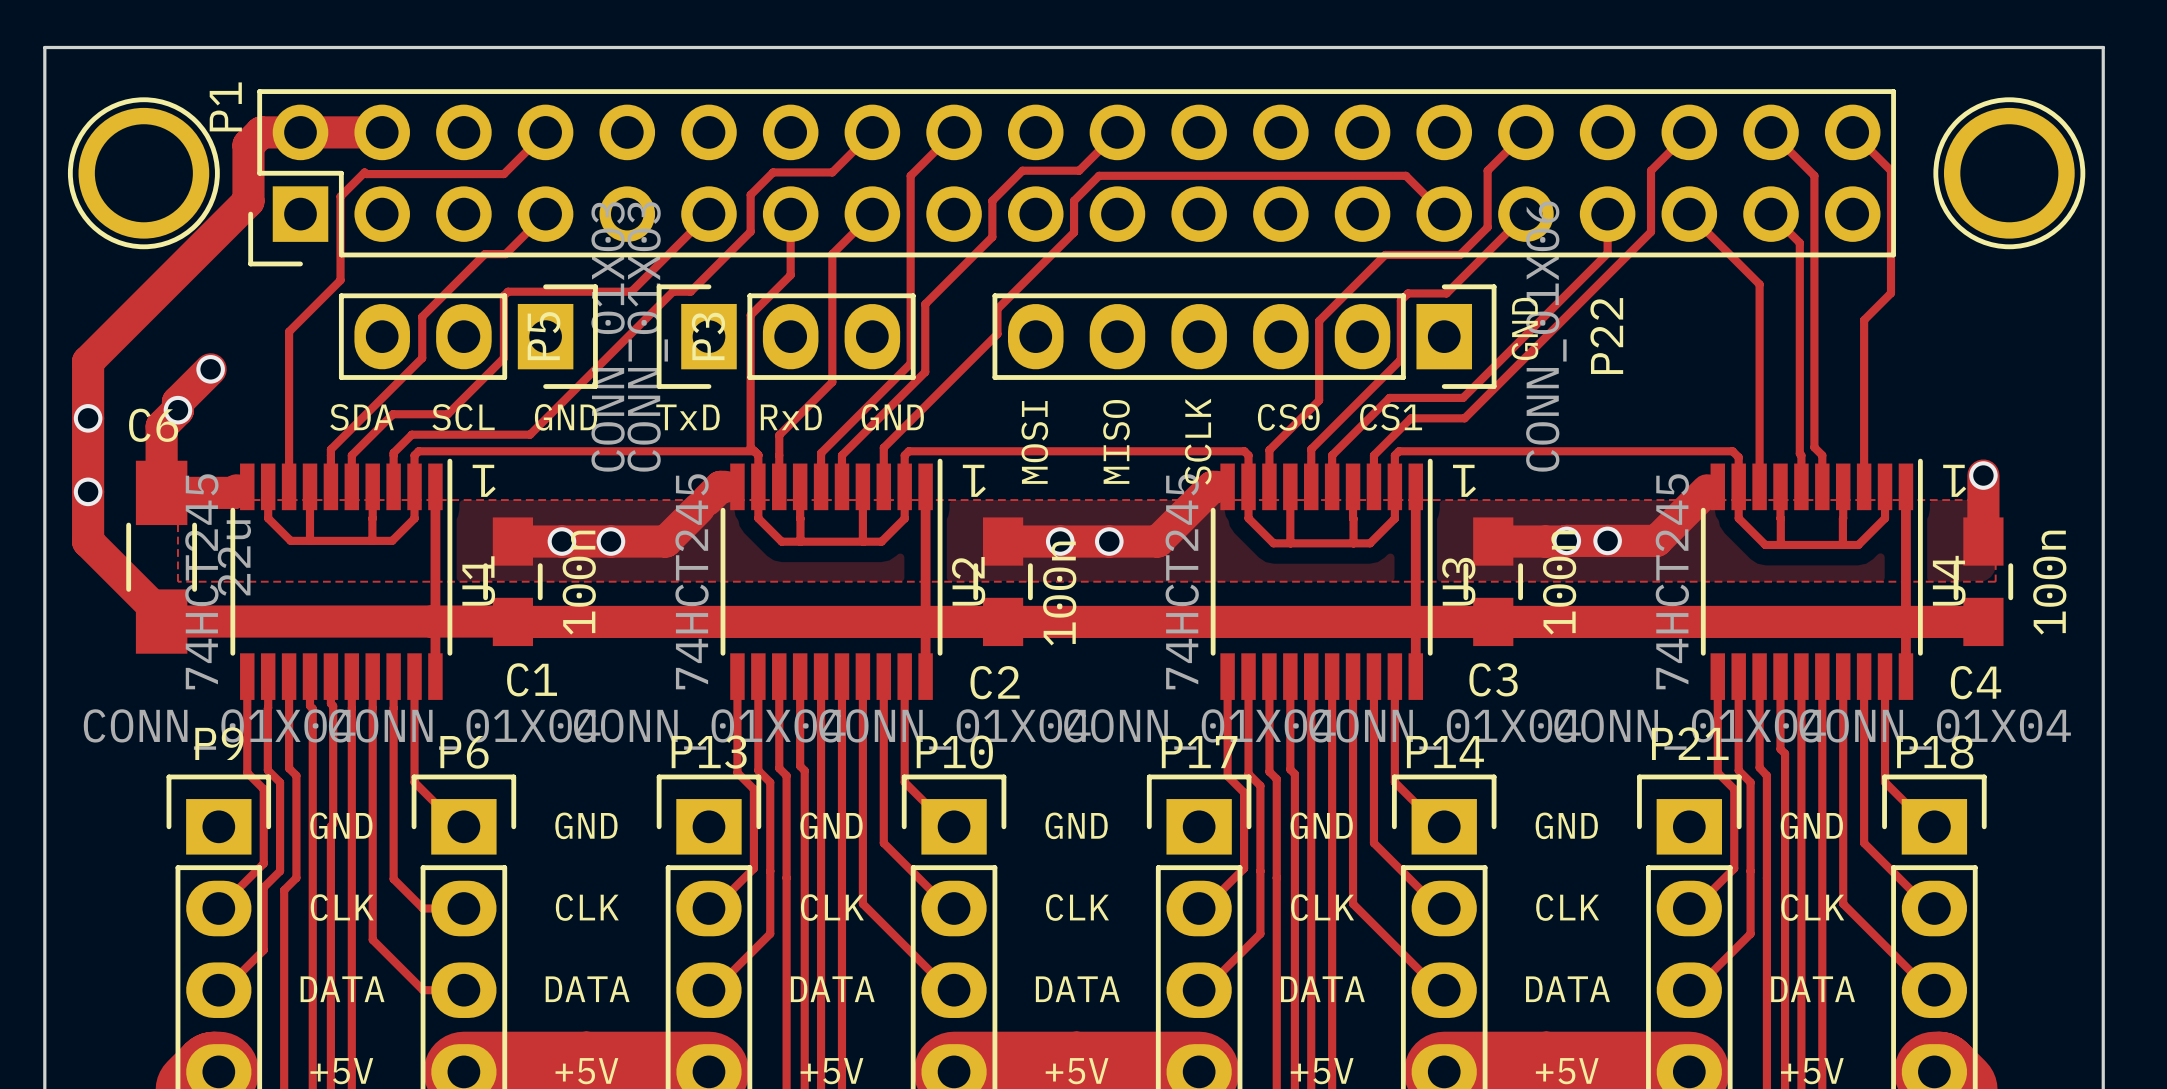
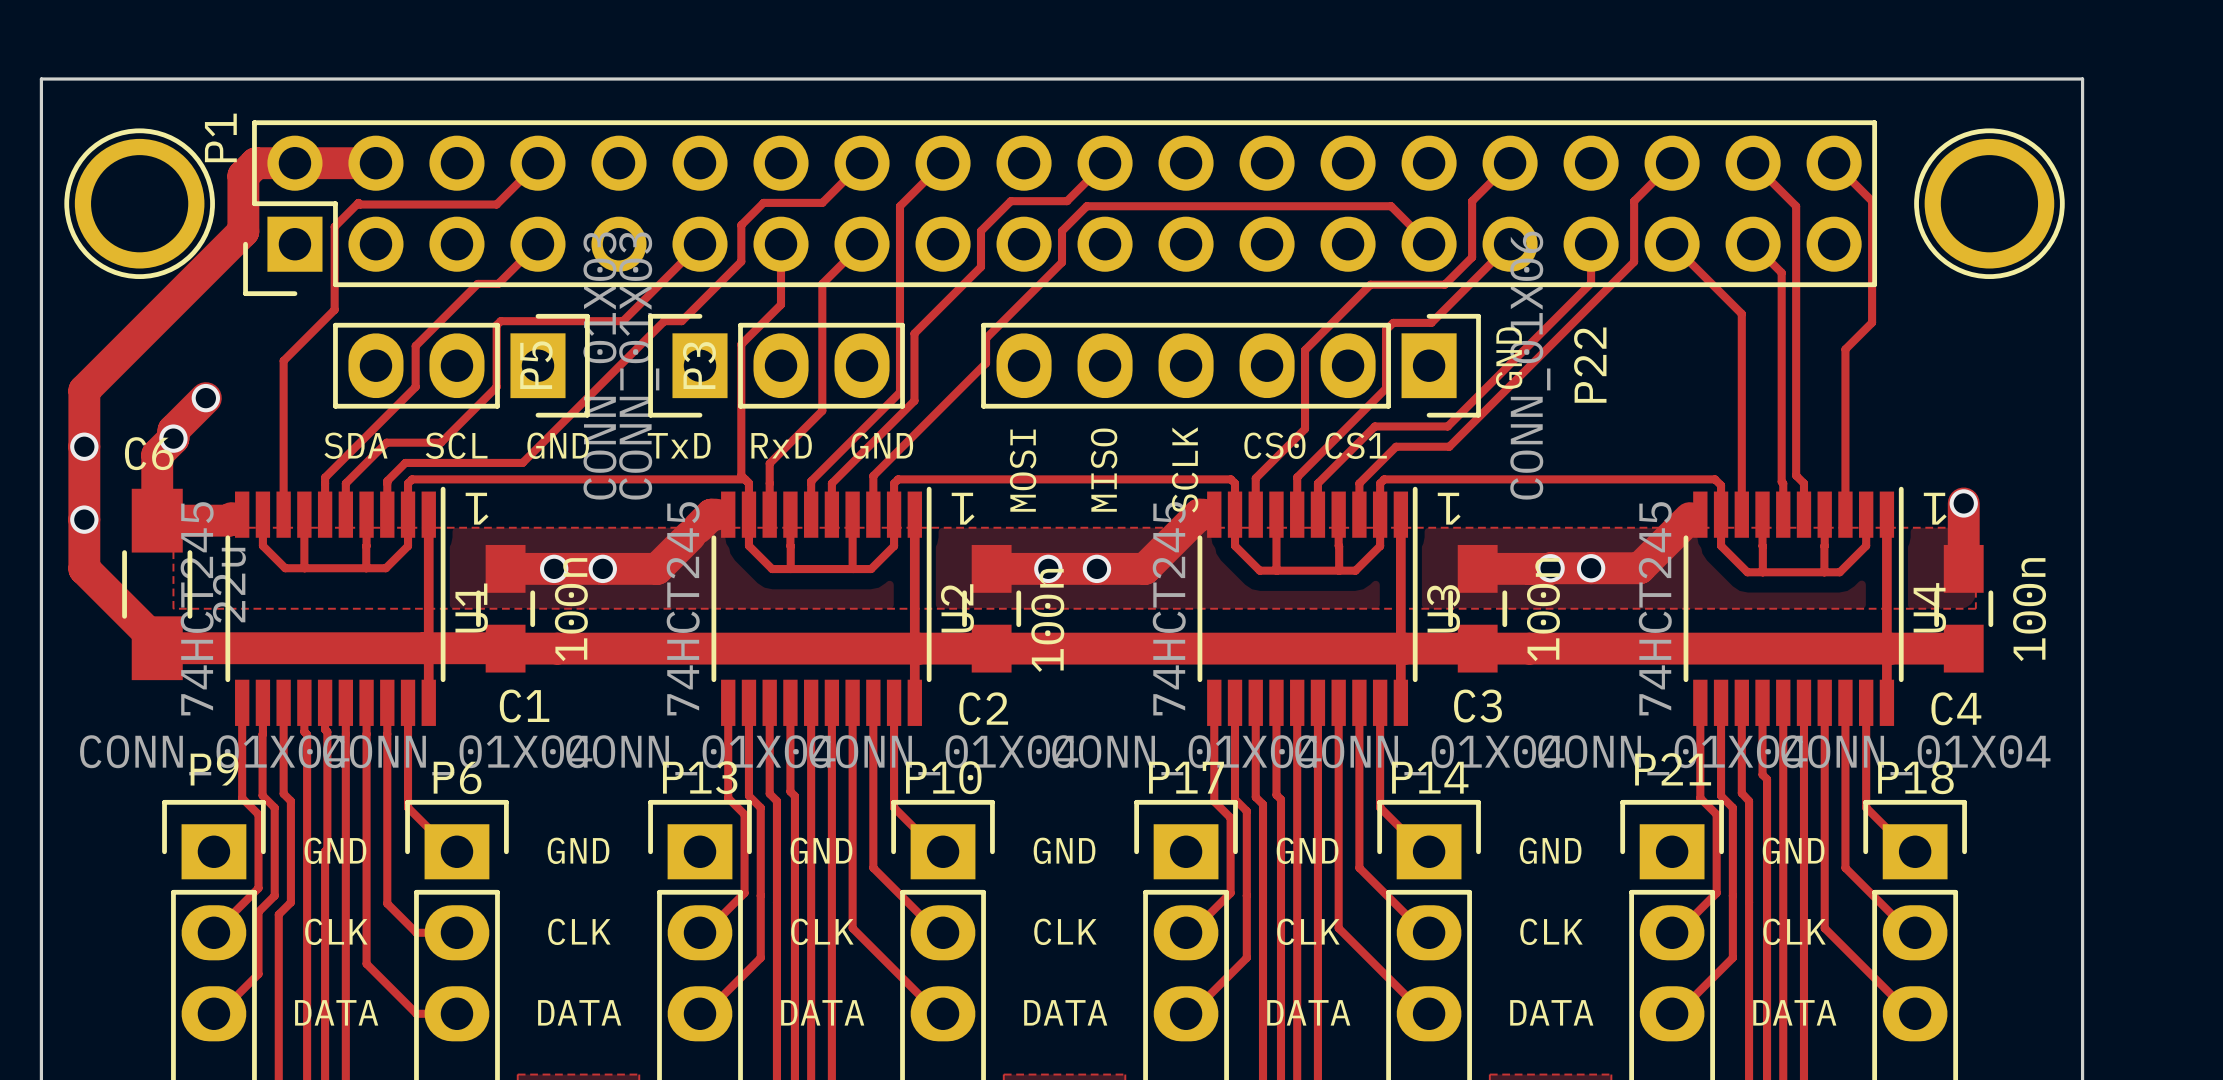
text position: CS1 (1391, 417) -> CS1 (1356, 445)

